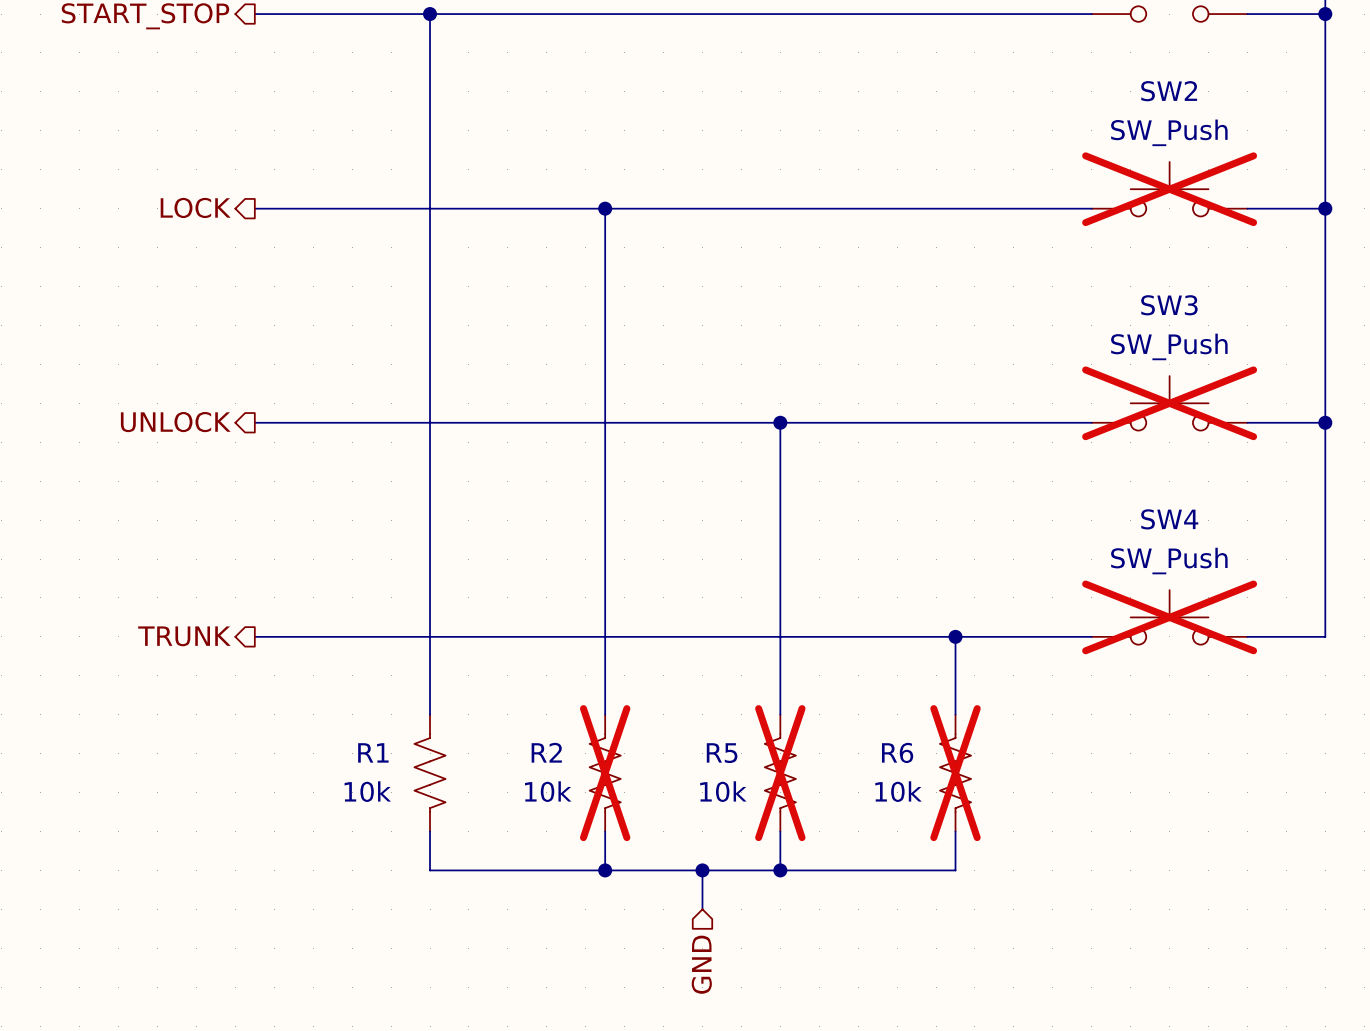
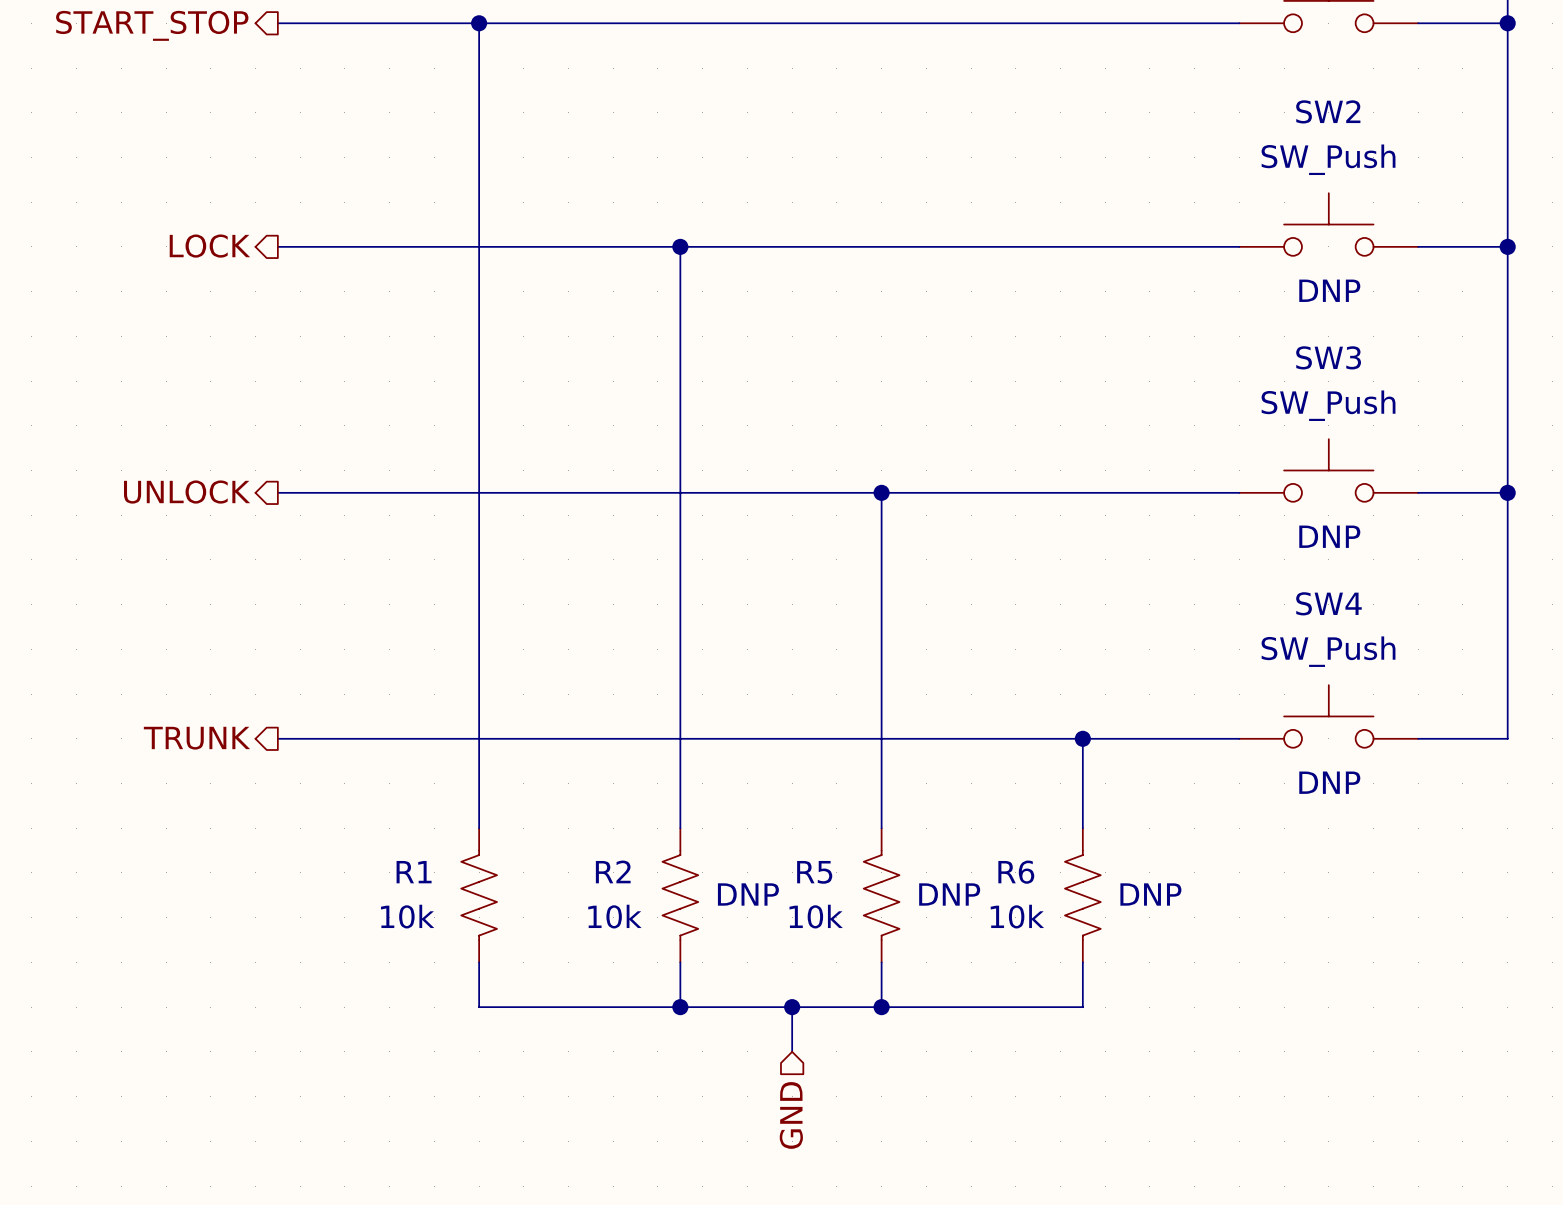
SW2 do-not-place cross: (1169, 189) -> none
SW2 text: none -> DNP (1329, 290)
SW3 do-not-place cross: (1169, 403) -> none
SW3 text: none -> DNP (1329, 536)
SW4 do-not-place cross: (1169, 617) -> none
SW4 text: none -> DNP (1329, 782)
R2 text: none -> DNP (748, 894)
R5 text: none -> DNP (949, 894)
R6 text: none -> DNP (1150, 894)
R2 do-not-place cross: (605, 773) -> none
R5 do-not-place cross: (780, 773) -> none
R6 do-not-place cross: (955, 773) -> none

